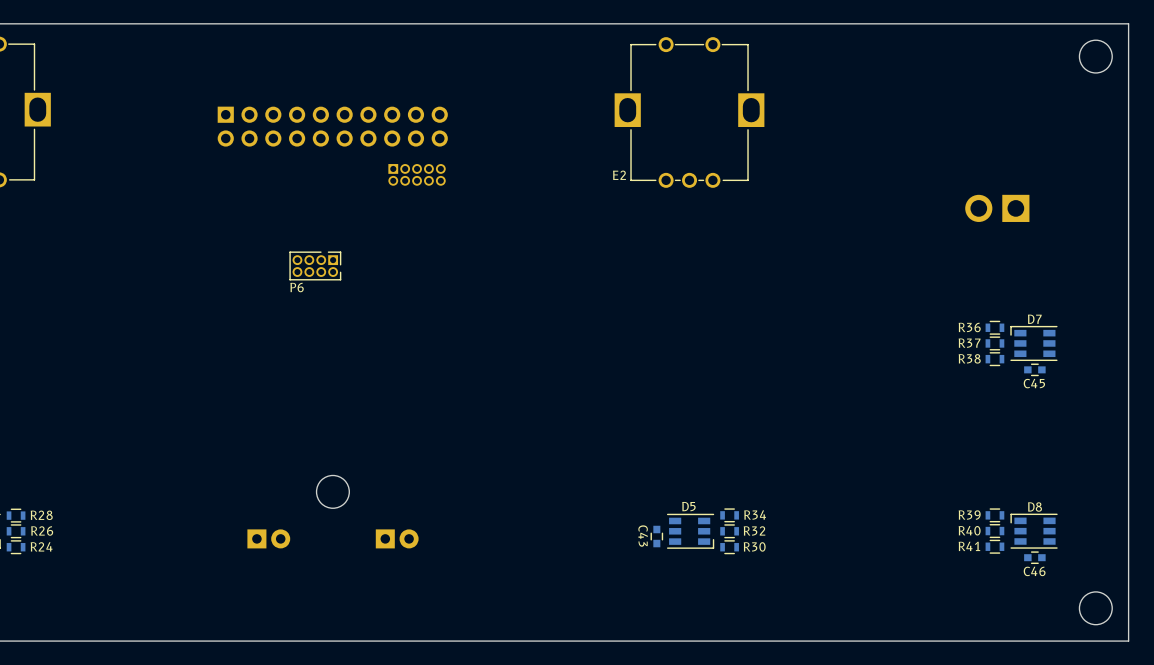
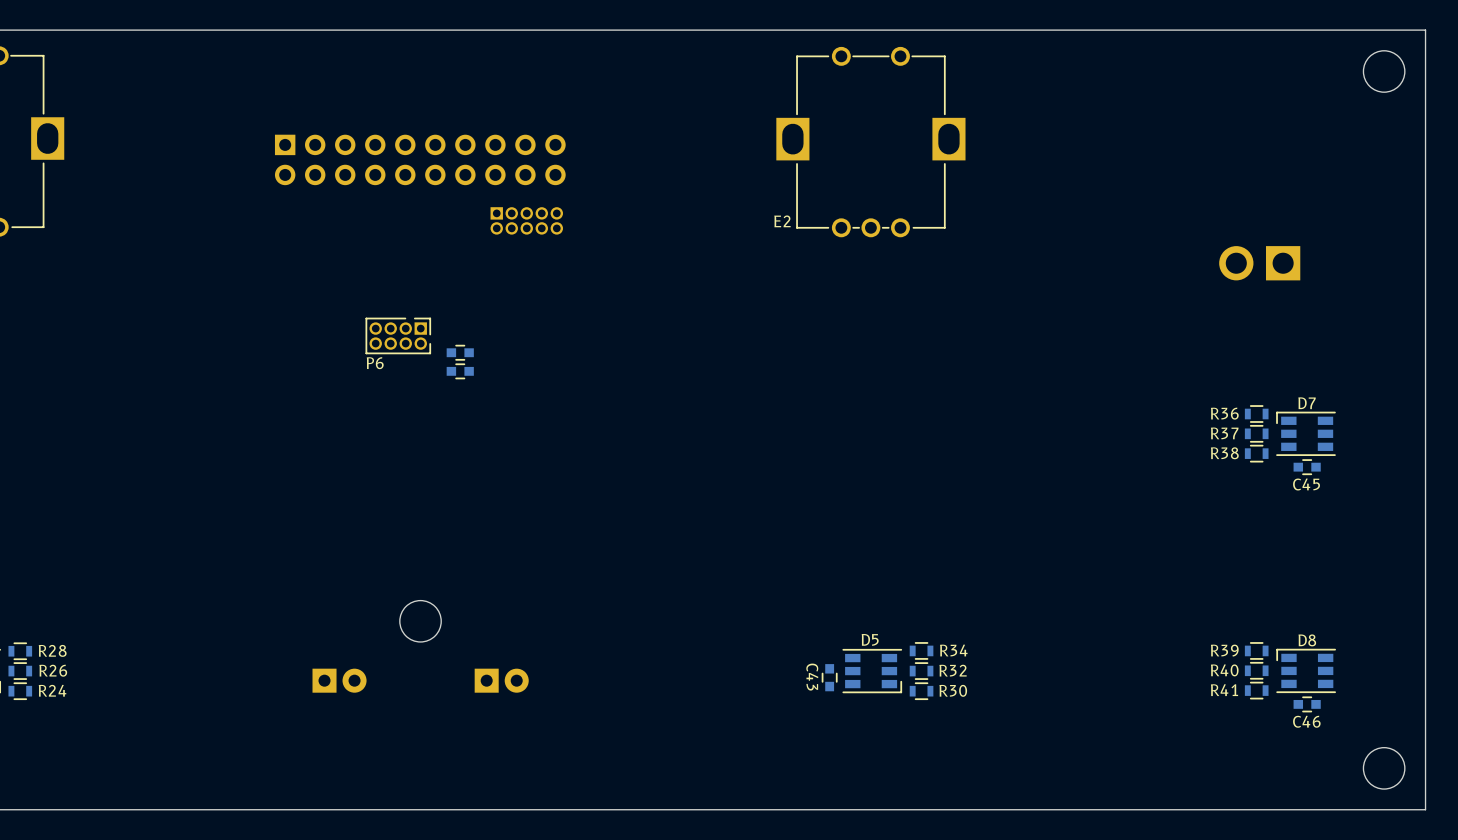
part: none -> (460, 352)
part: none -> (460, 371)

